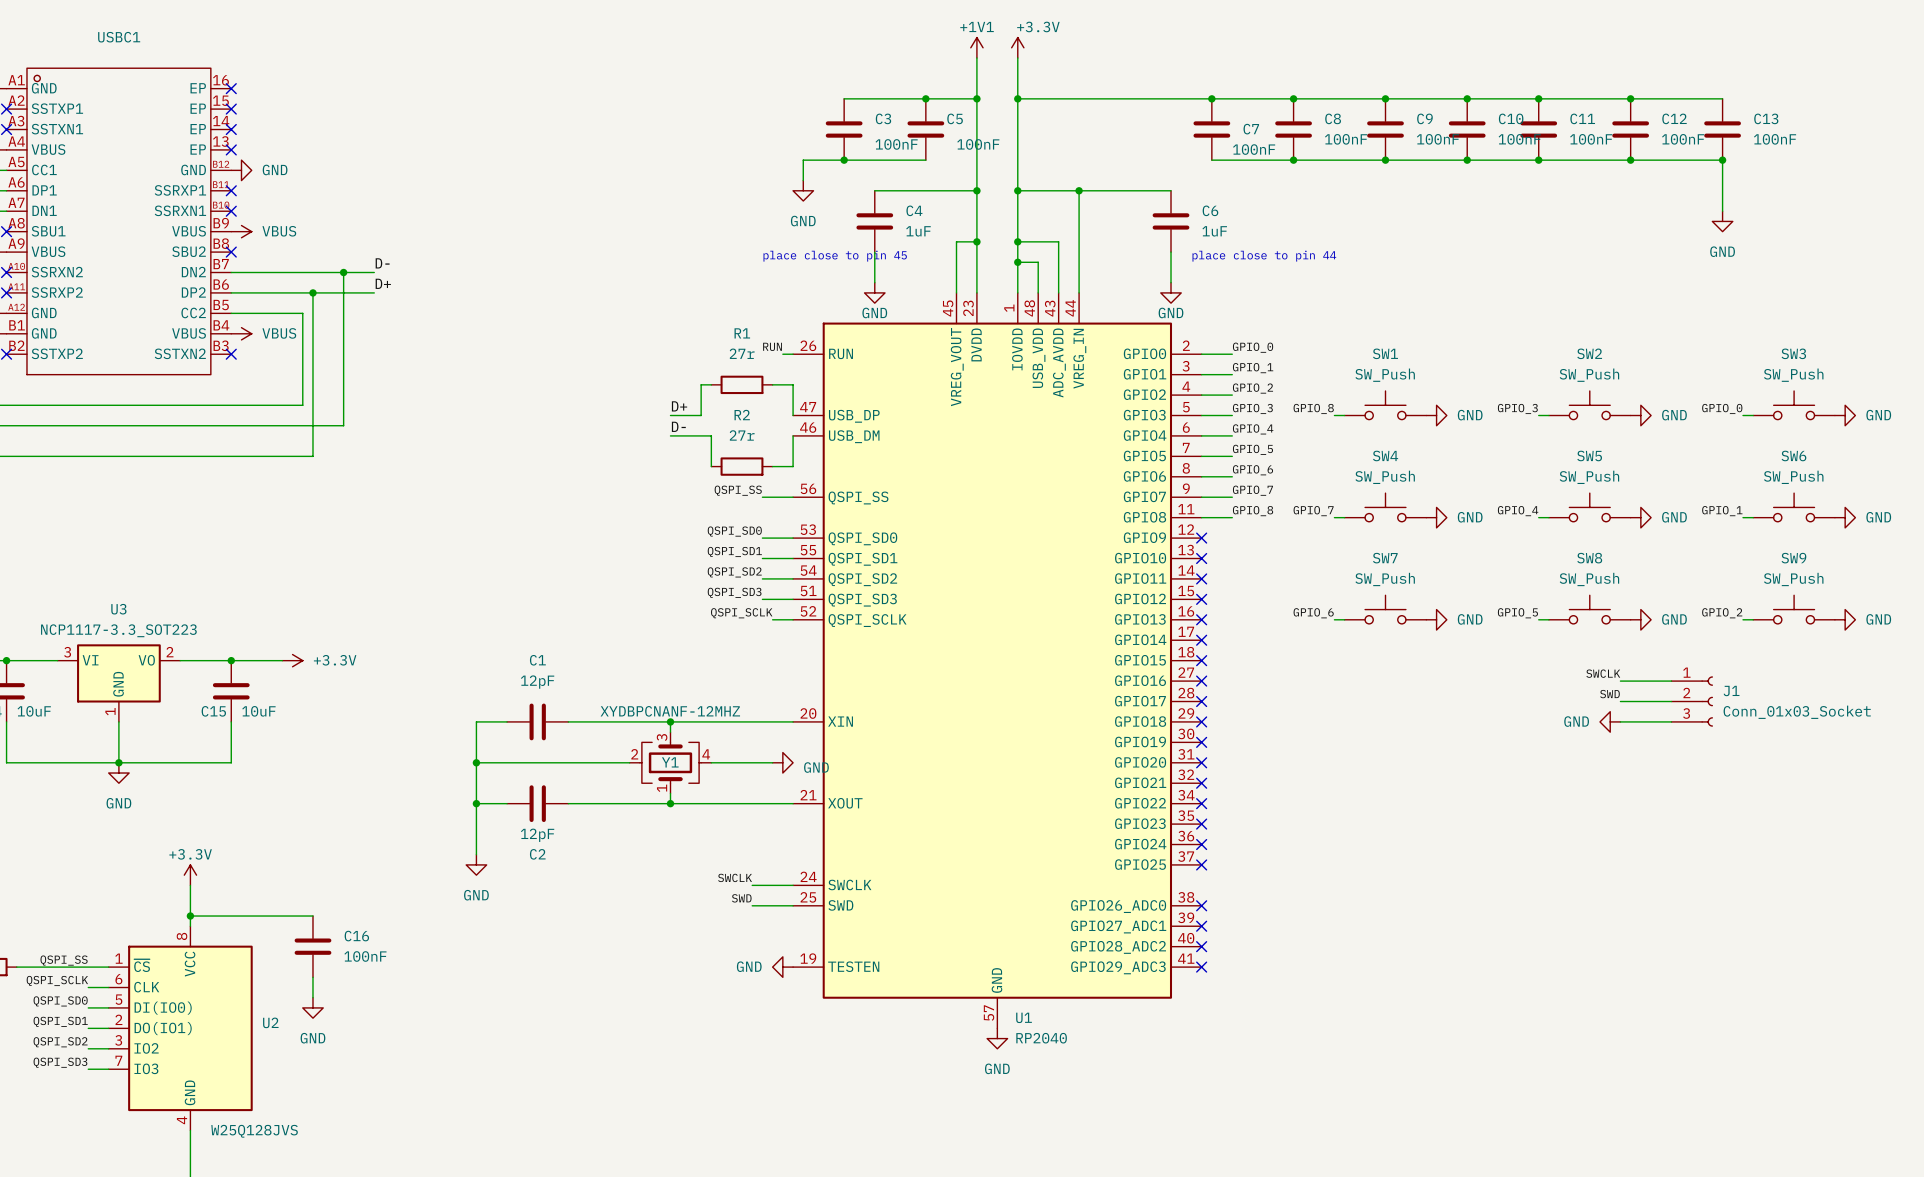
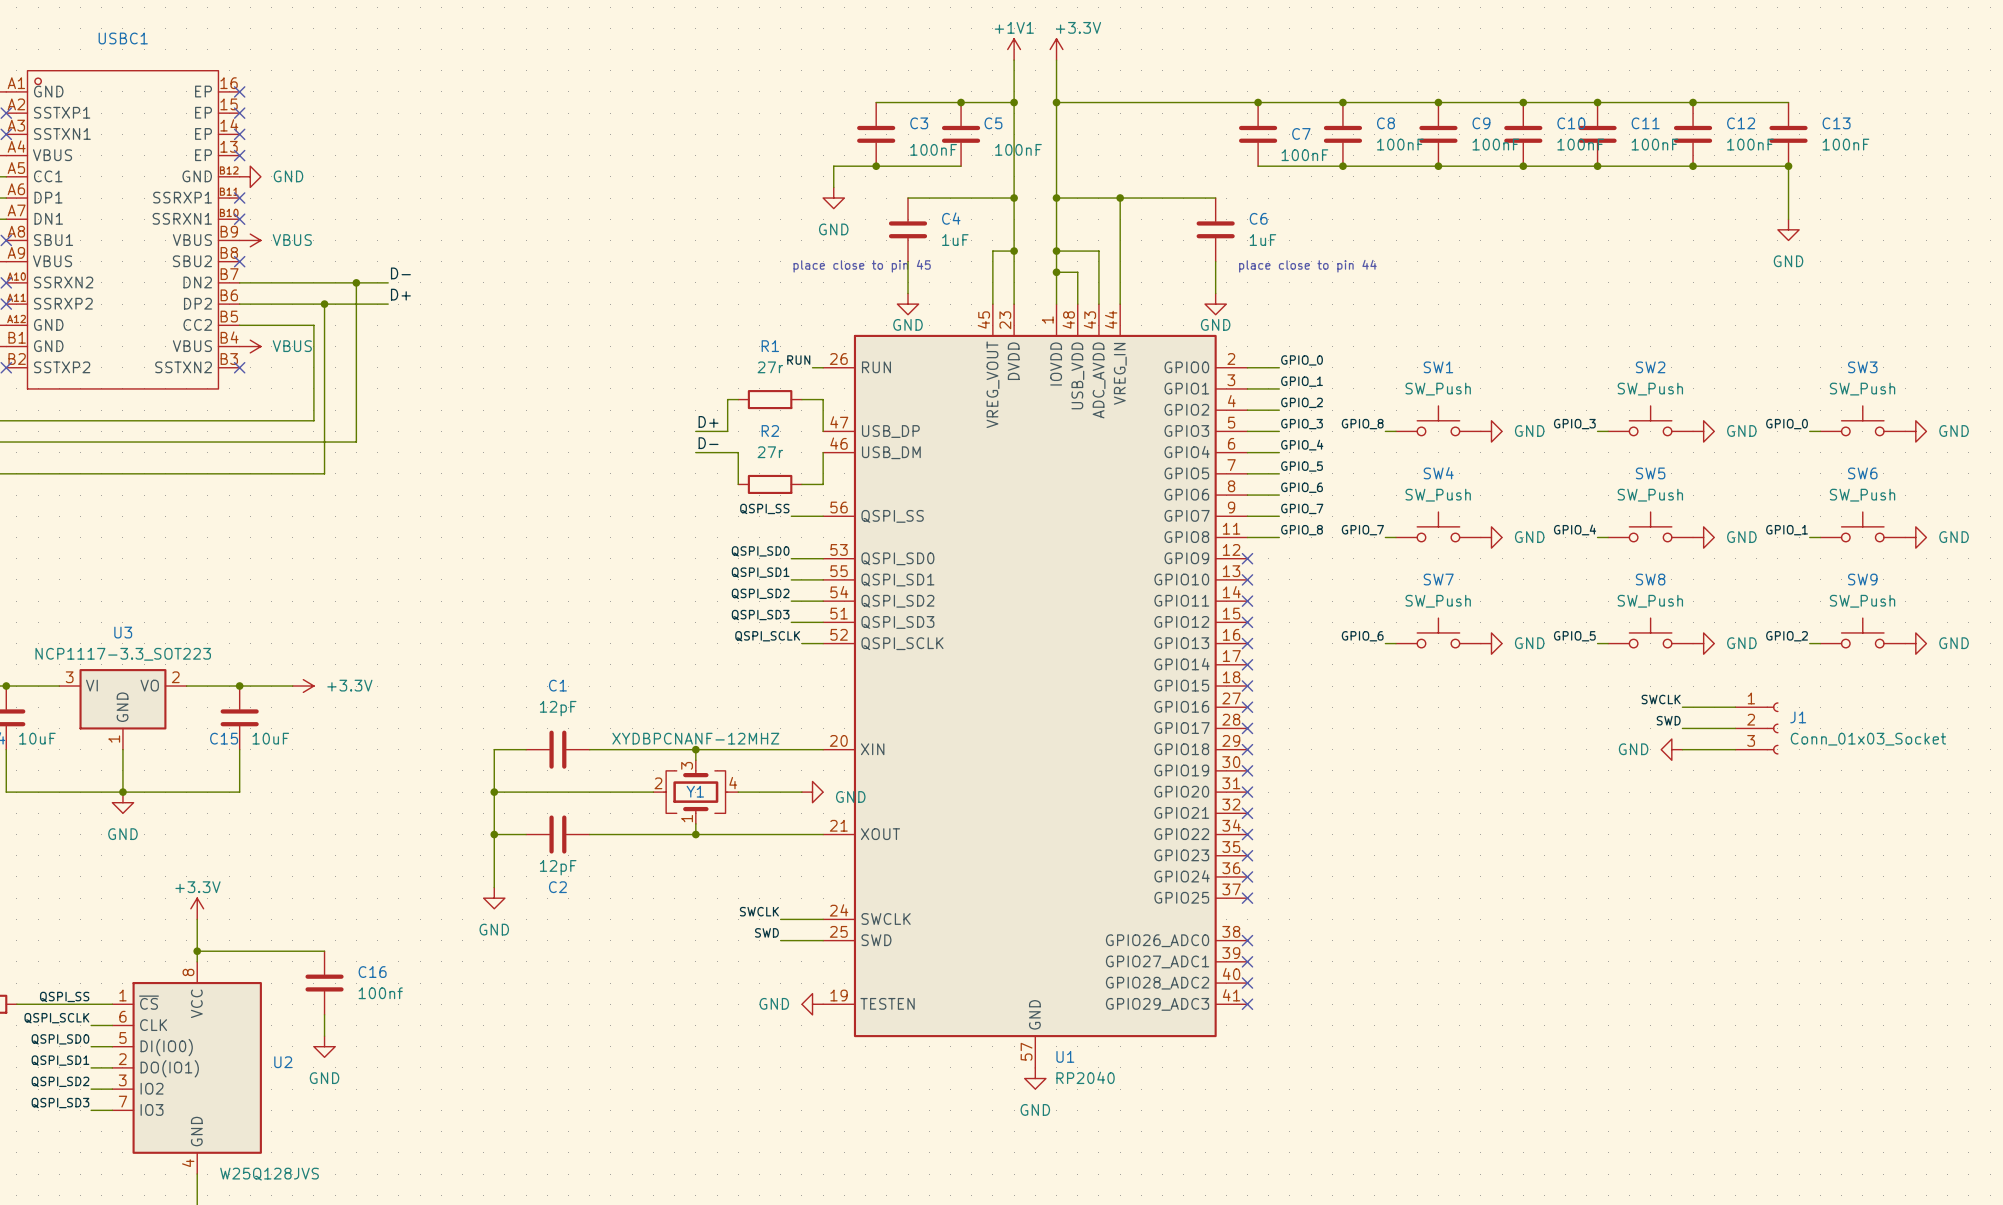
C16 value: 100nF (365, 956) -> 100nf (380, 993)

